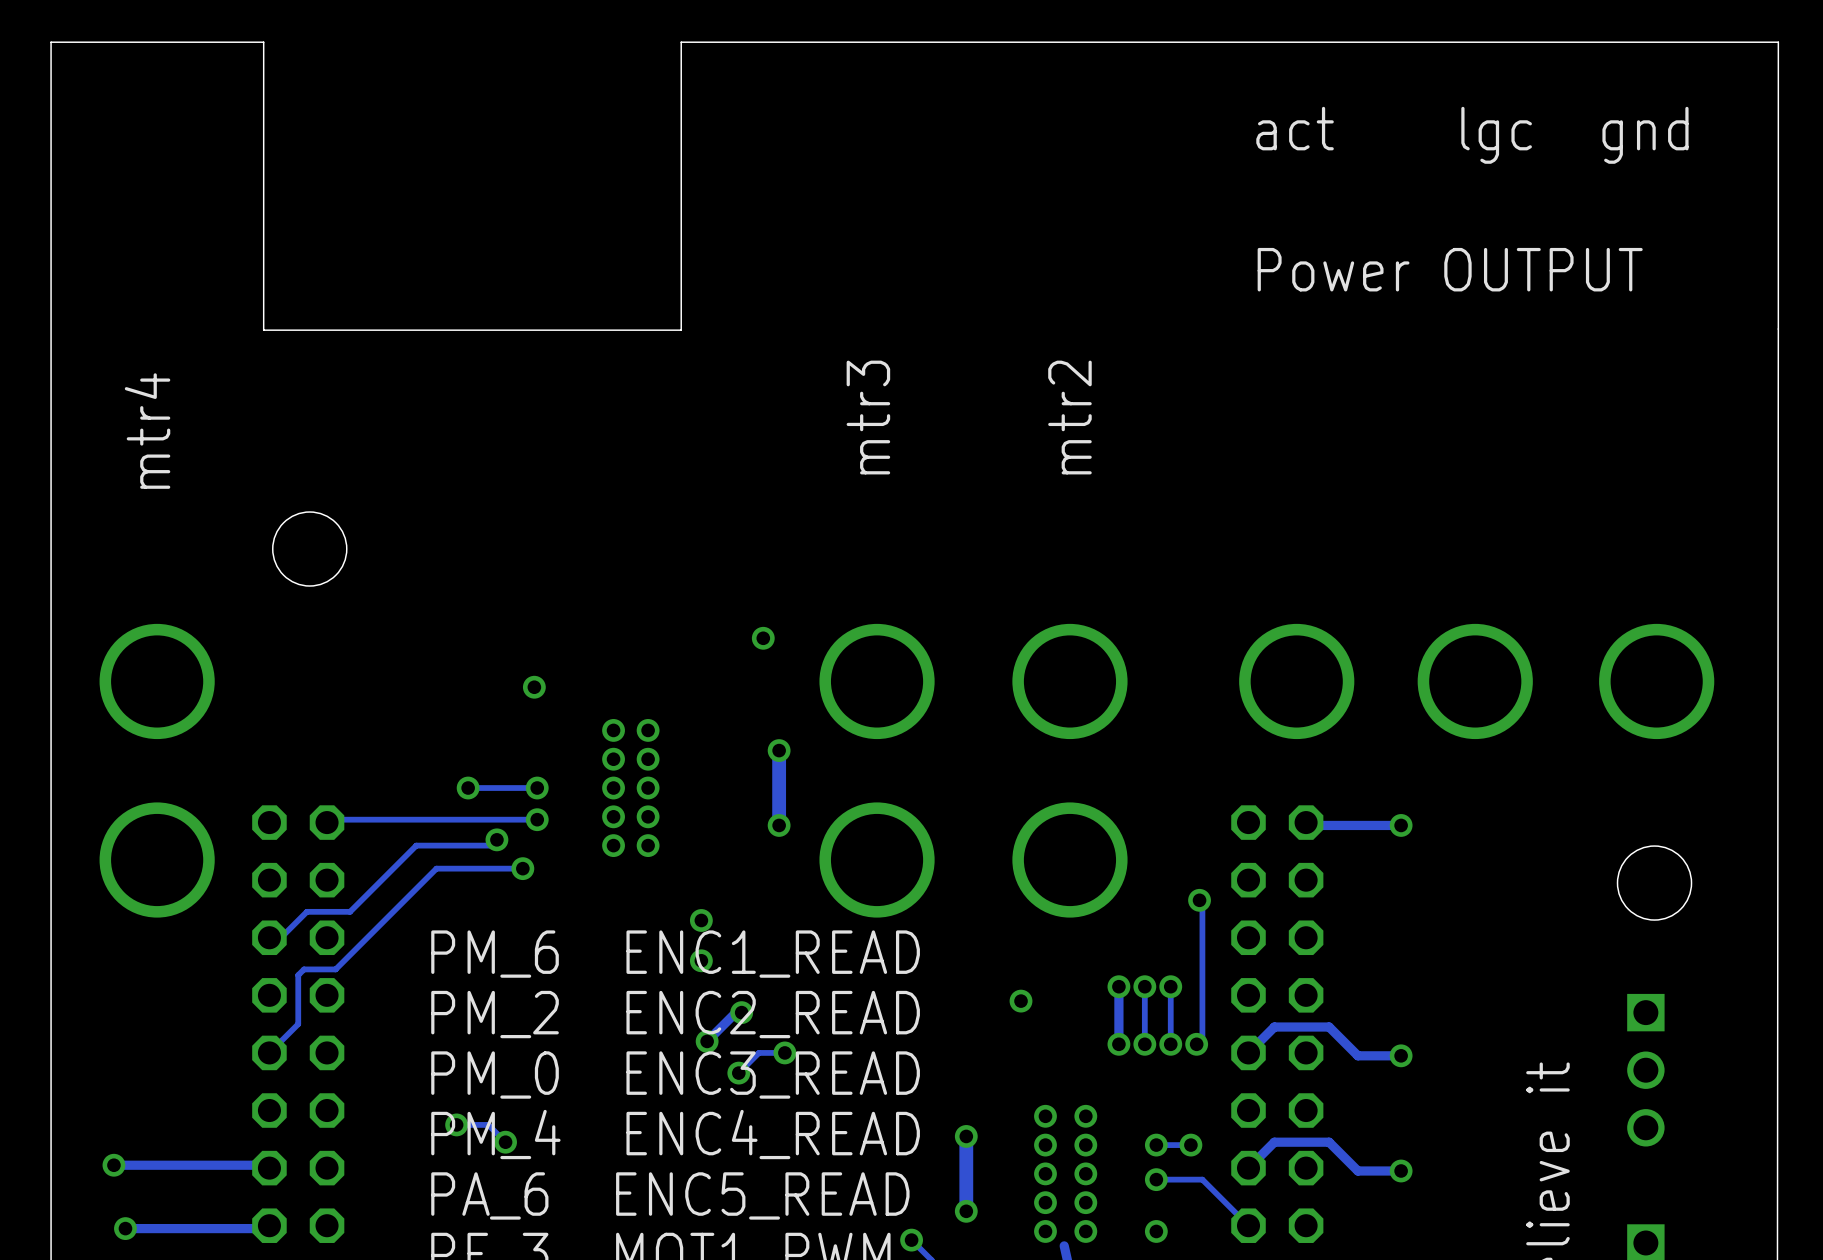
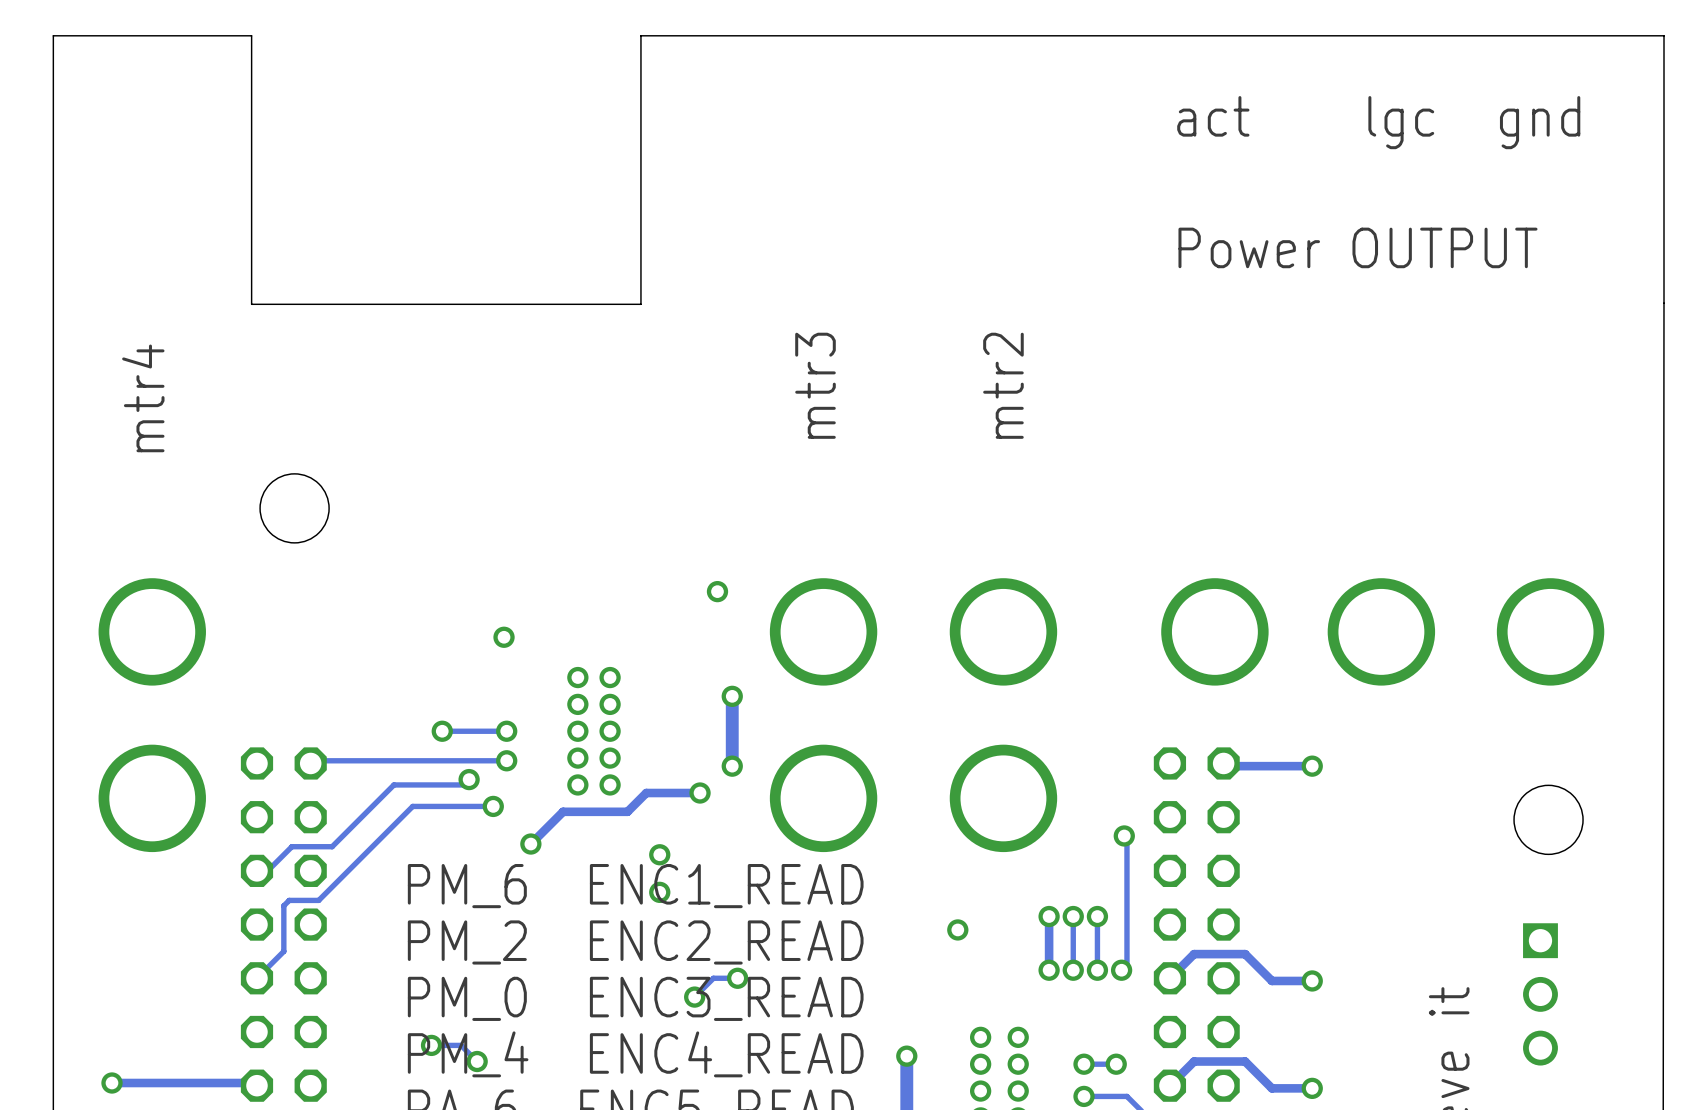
track: none -> (700, 793) (646, 793) (627, 811) (563, 811) (530, 844)
via: none -> (700, 793)
via: none -> (530, 844)
track: (741, 1012) (735, 1012) (707, 1041) -> none
via: (741, 1012) -> none
via: (707, 1041) -> none

